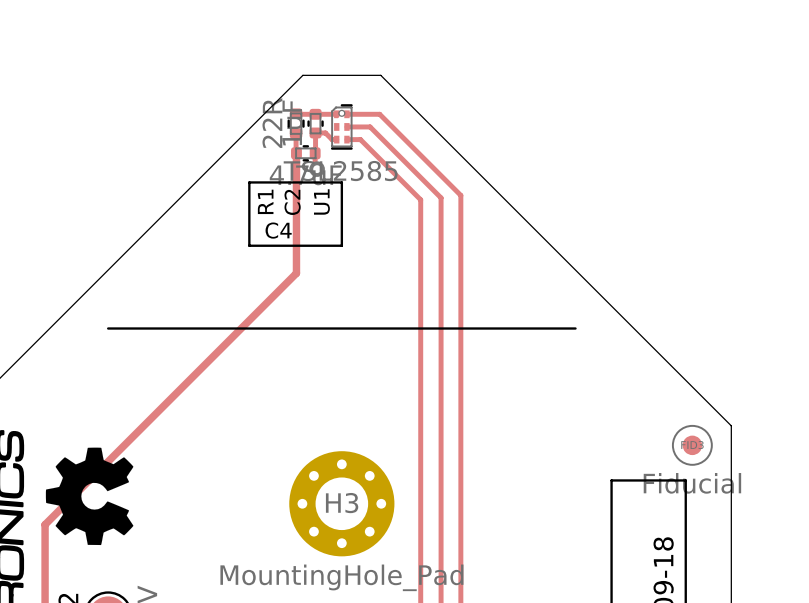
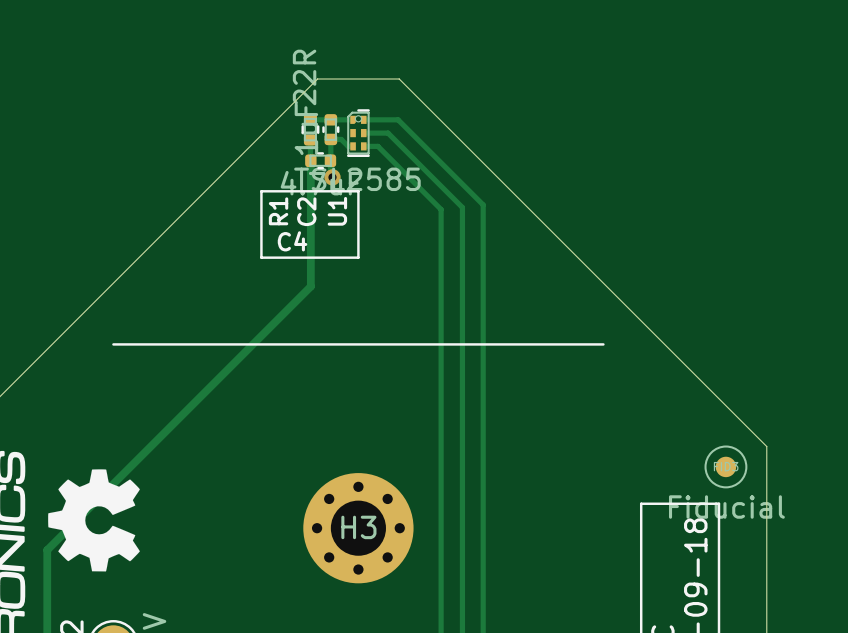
R1 value position: 22R (272, 123) -> 22R (304, 77)
H3 value: MountingHole_Pad (341, 577) -> none

